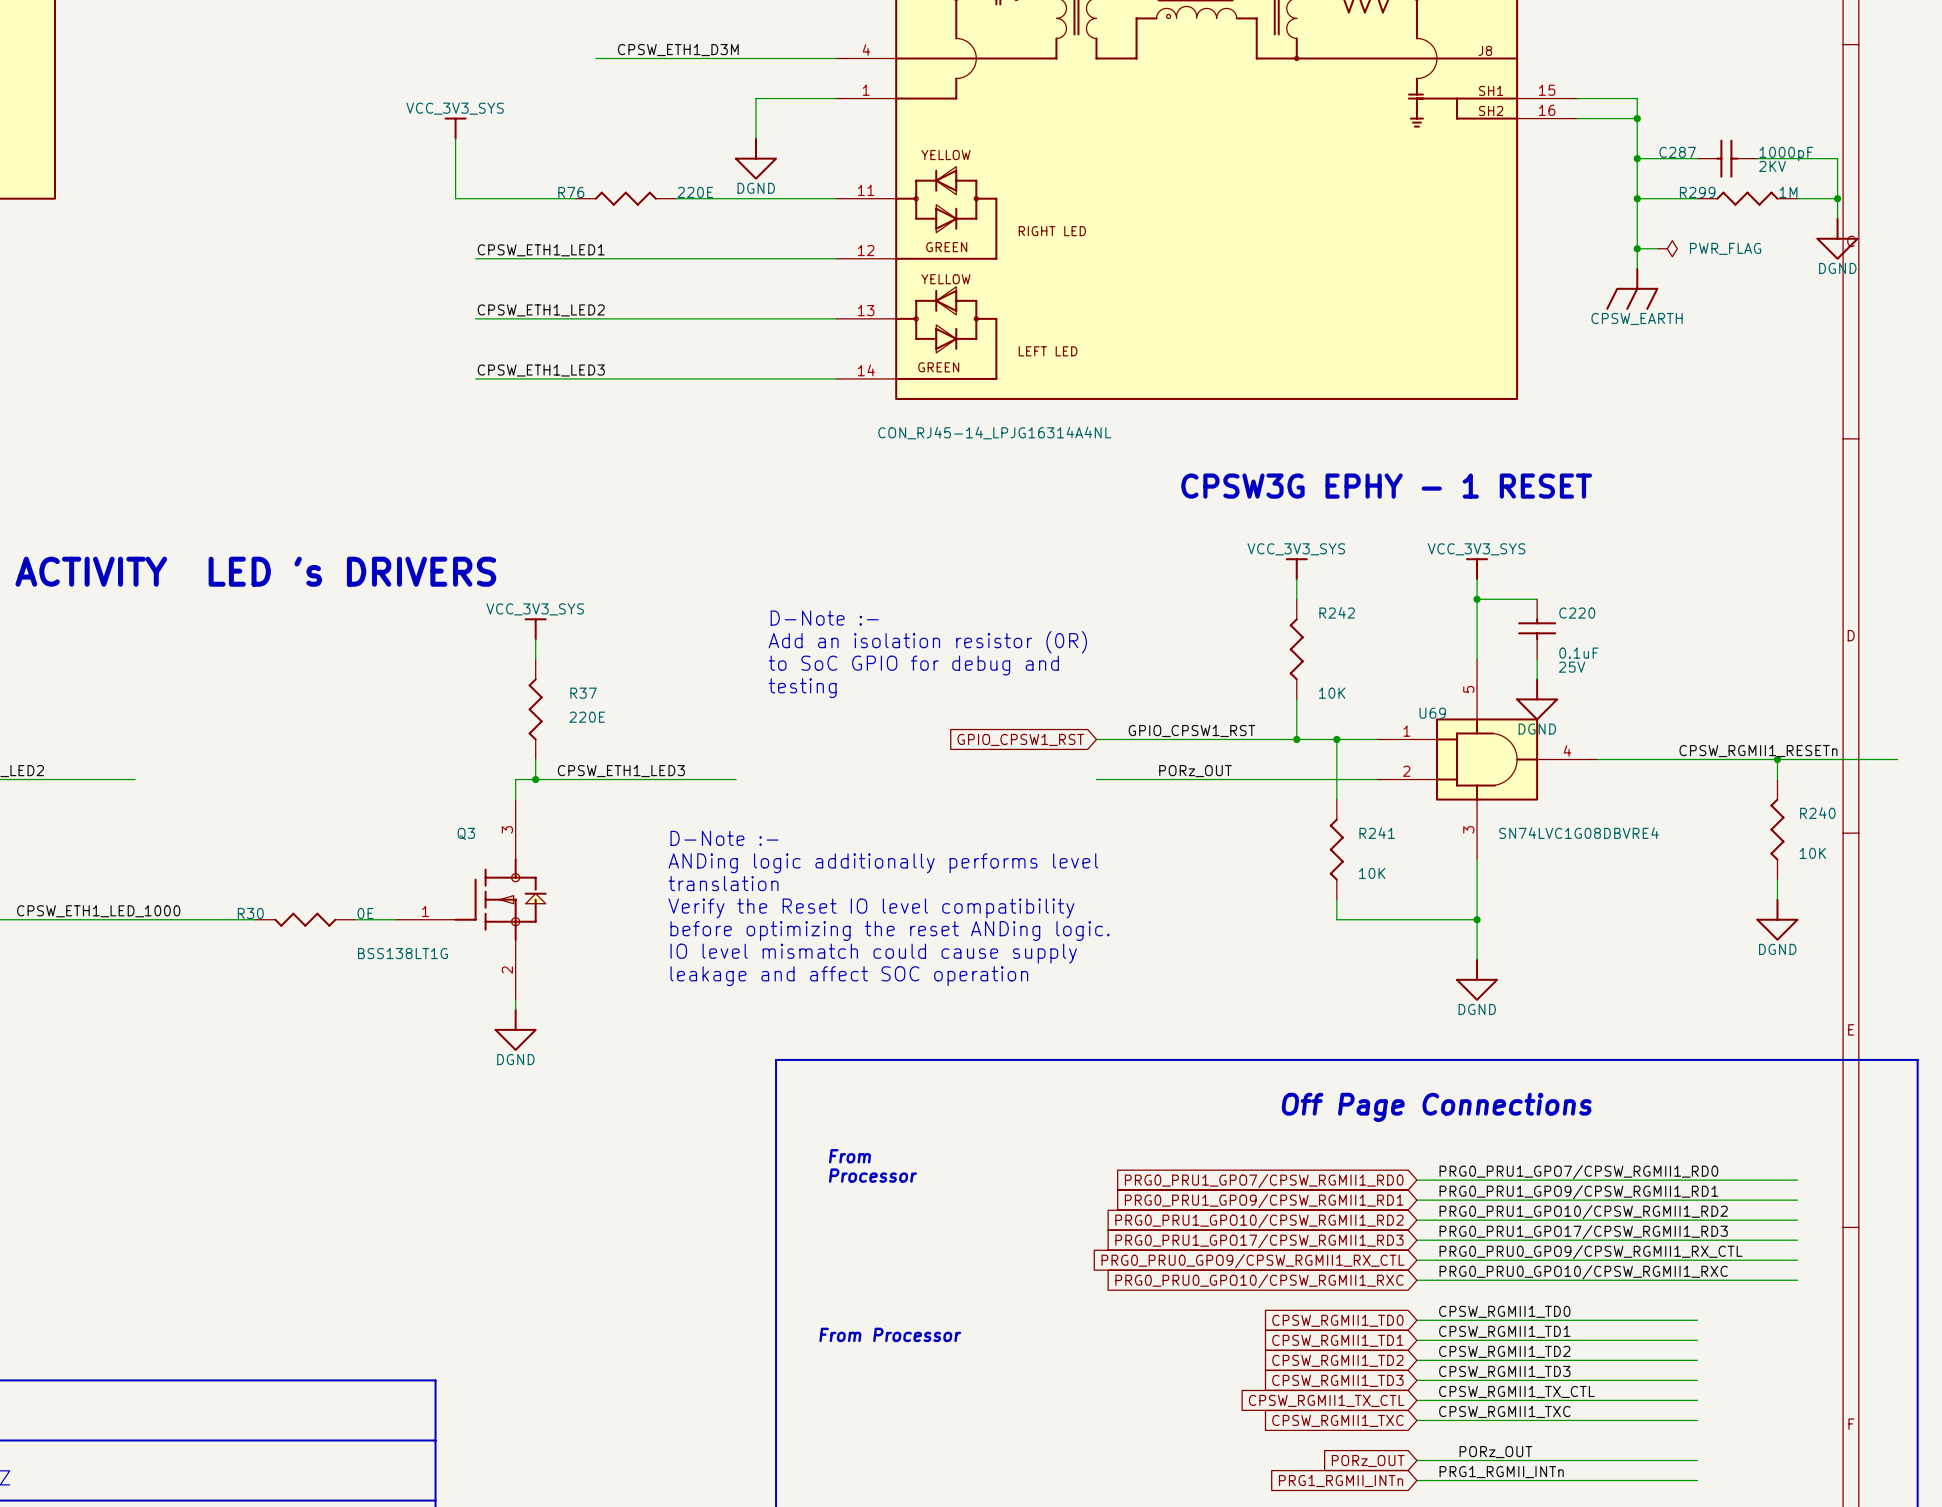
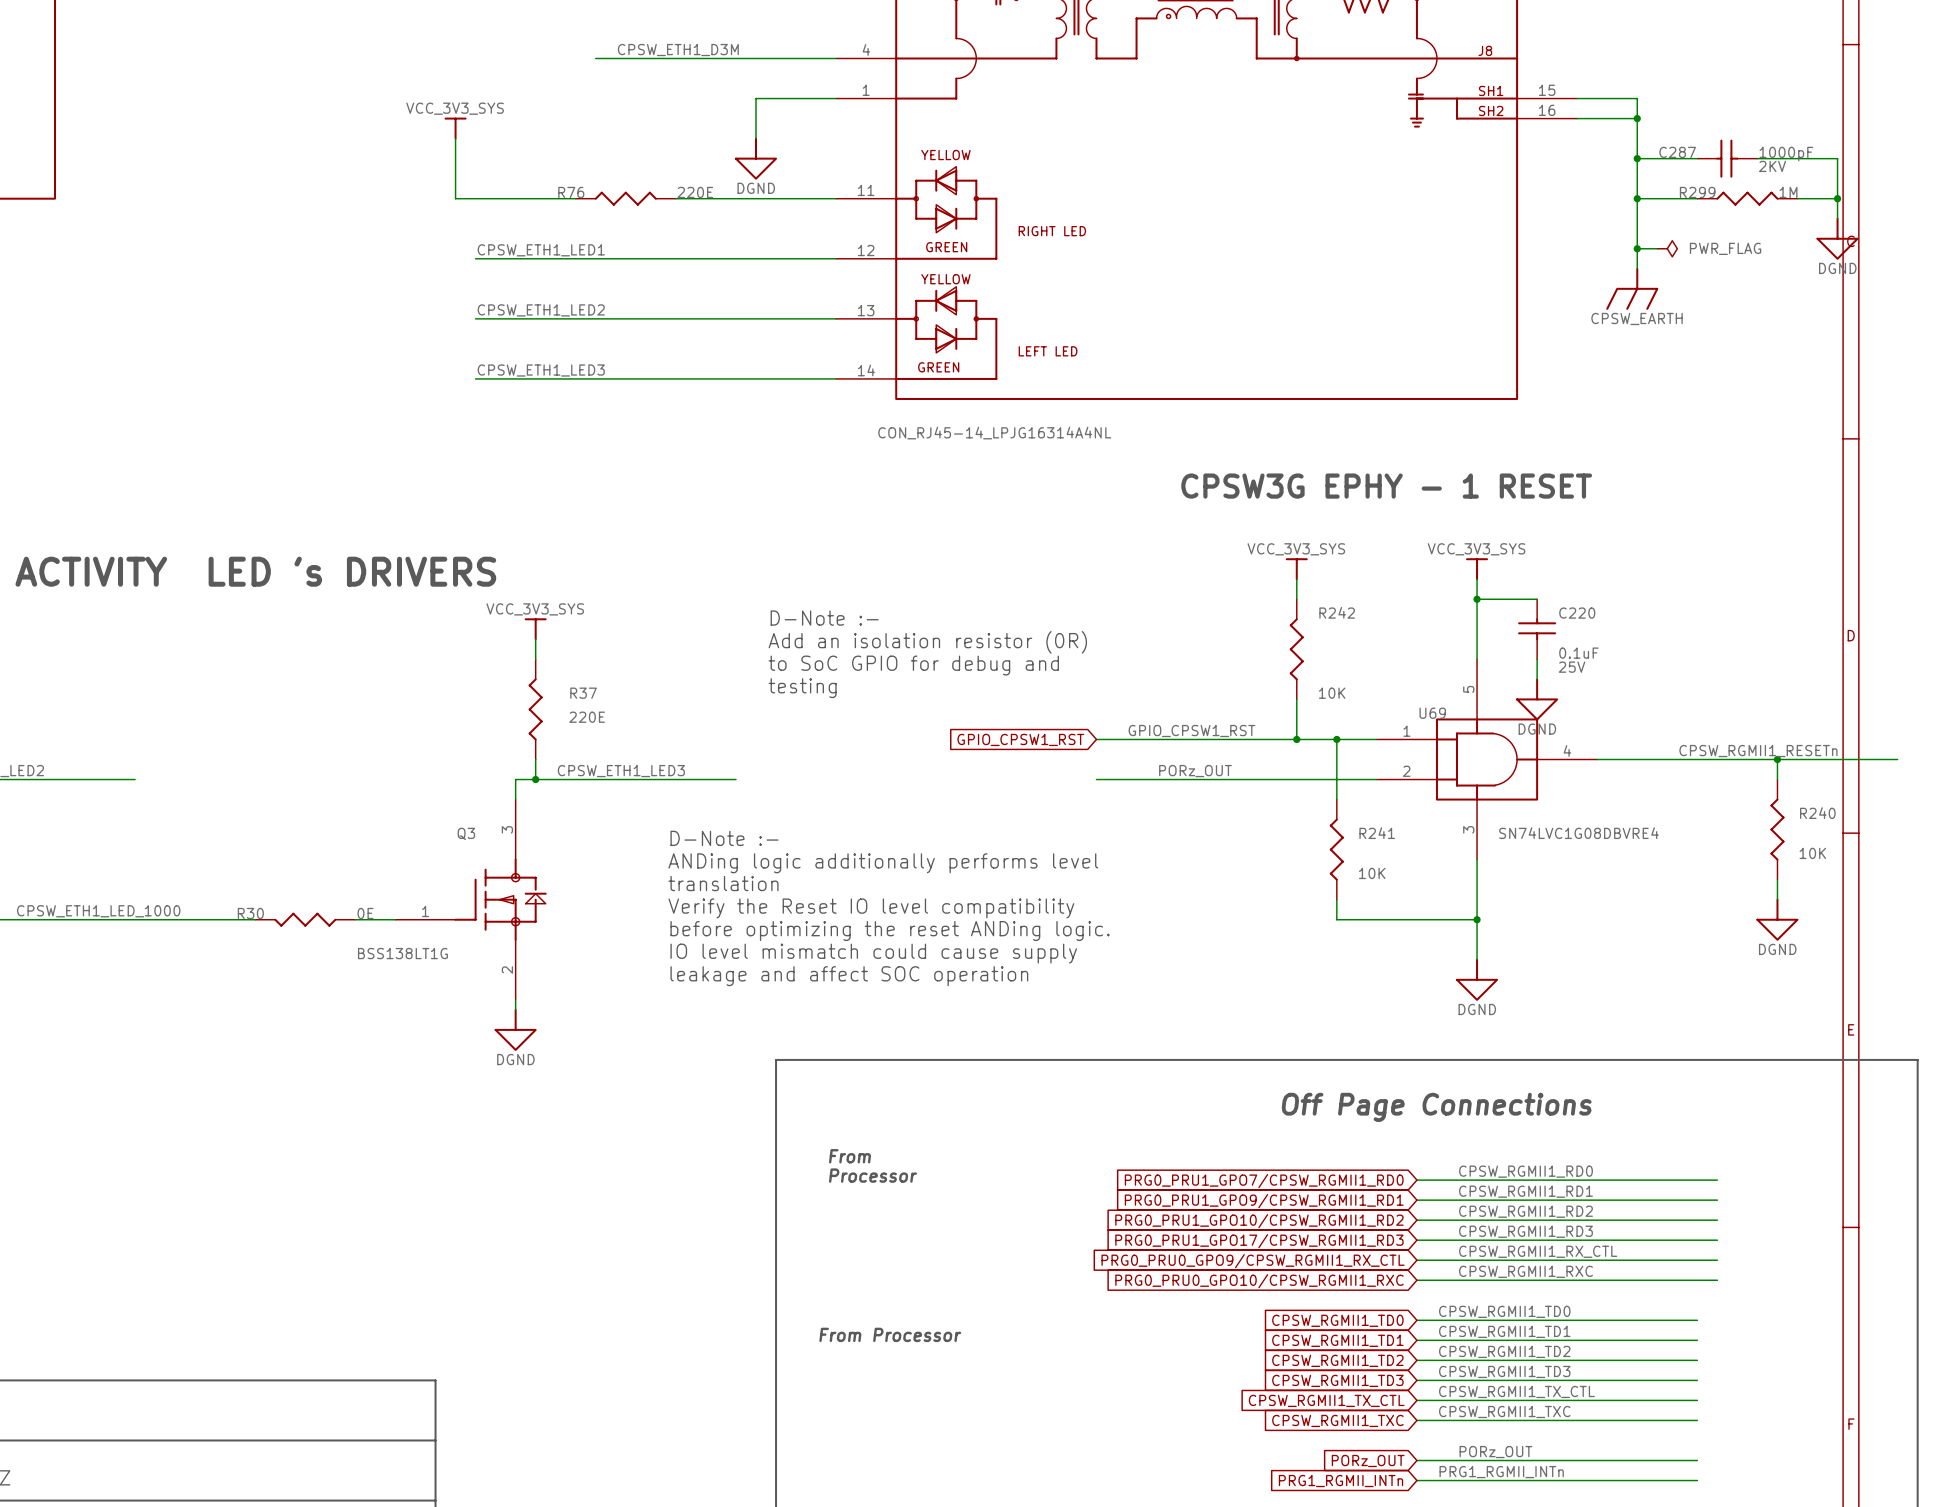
label: none -> CPSW_RGMII1_RD0 (1525, 1171)
label: PRG0_PRU1_GPO7/CPSW_RGMII1_RD0 (1578, 1172) -> none
wire: (1717, 1180) (1797, 1180) -> none
label: none -> CPSW_RGMII1_RD1 (1525, 1191)
label: PRG0_PRU1_GPO9/CPSW_RGMII1_RD1 (1578, 1192) -> none
wire: (1717, 1200) (1797, 1200) -> none
label: none -> CPSW_RGMII1_RD2 (1525, 1211)
label: PRG0_PRU1_GPO10/CPSW_RGMII1_RD2 (1583, 1212) -> none
wire: (1717, 1220) (1797, 1220) -> none
label: none -> CPSW_RGMII1_RD3 (1525, 1231)
label: PRG0_PRU1_GPO17/CPSW_RGMII1_RD3 (1583, 1232) -> none
wire: (1717, 1240) (1797, 1240) -> none
label: none -> CPSW_RGMII1_RX_CTL (1538, 1251)
label: PRG0_PRU0_GPO9/CPSW_RGMII1_RX_CTL (1591, 1252) -> none
wire: (1717, 1260) (1797, 1260) -> none
label: none -> CPSW_RGMII1_RXC (1525, 1271)
label: PRG0_PRU0_GPO10/CPSW_RGMII1_RXC (1583, 1272) -> none
wire: (1717, 1280) (1797, 1280) -> none

